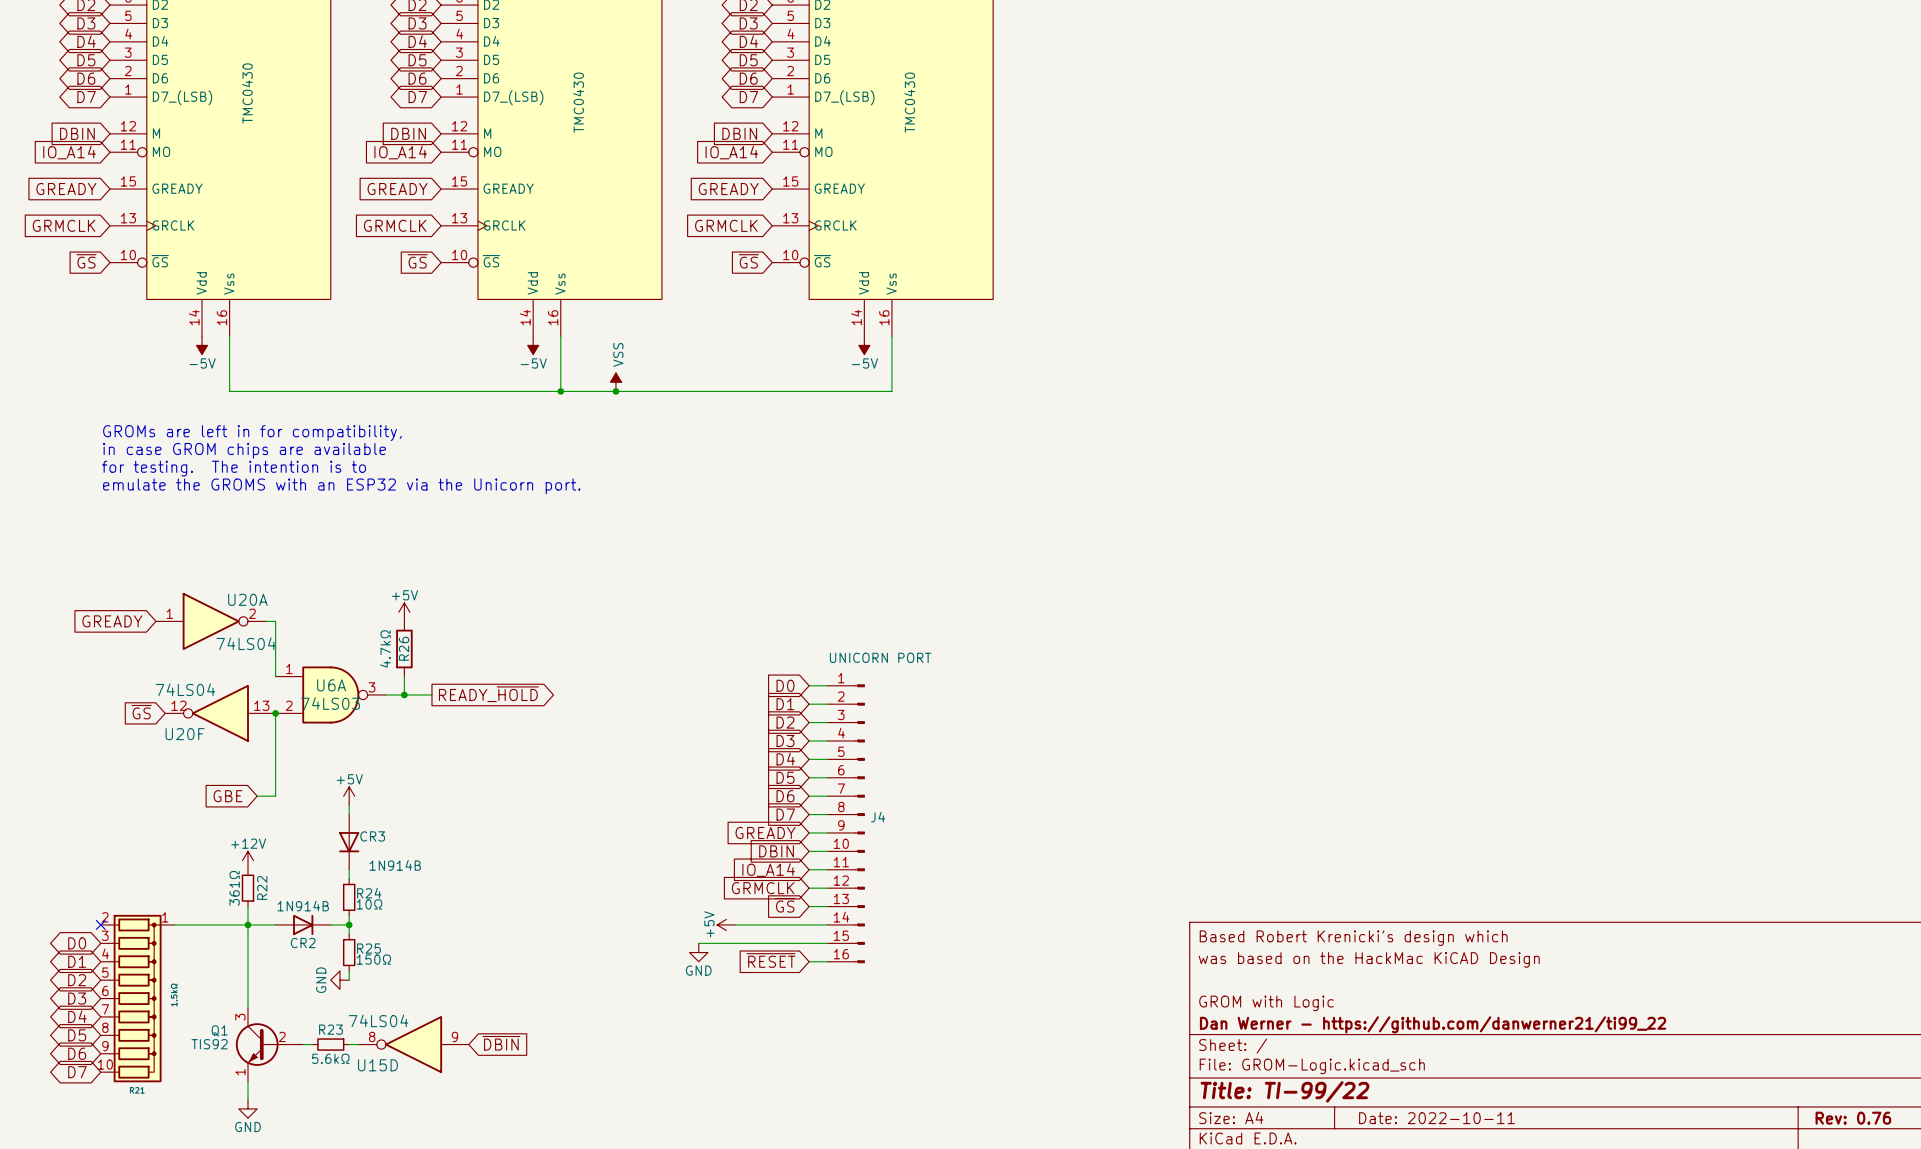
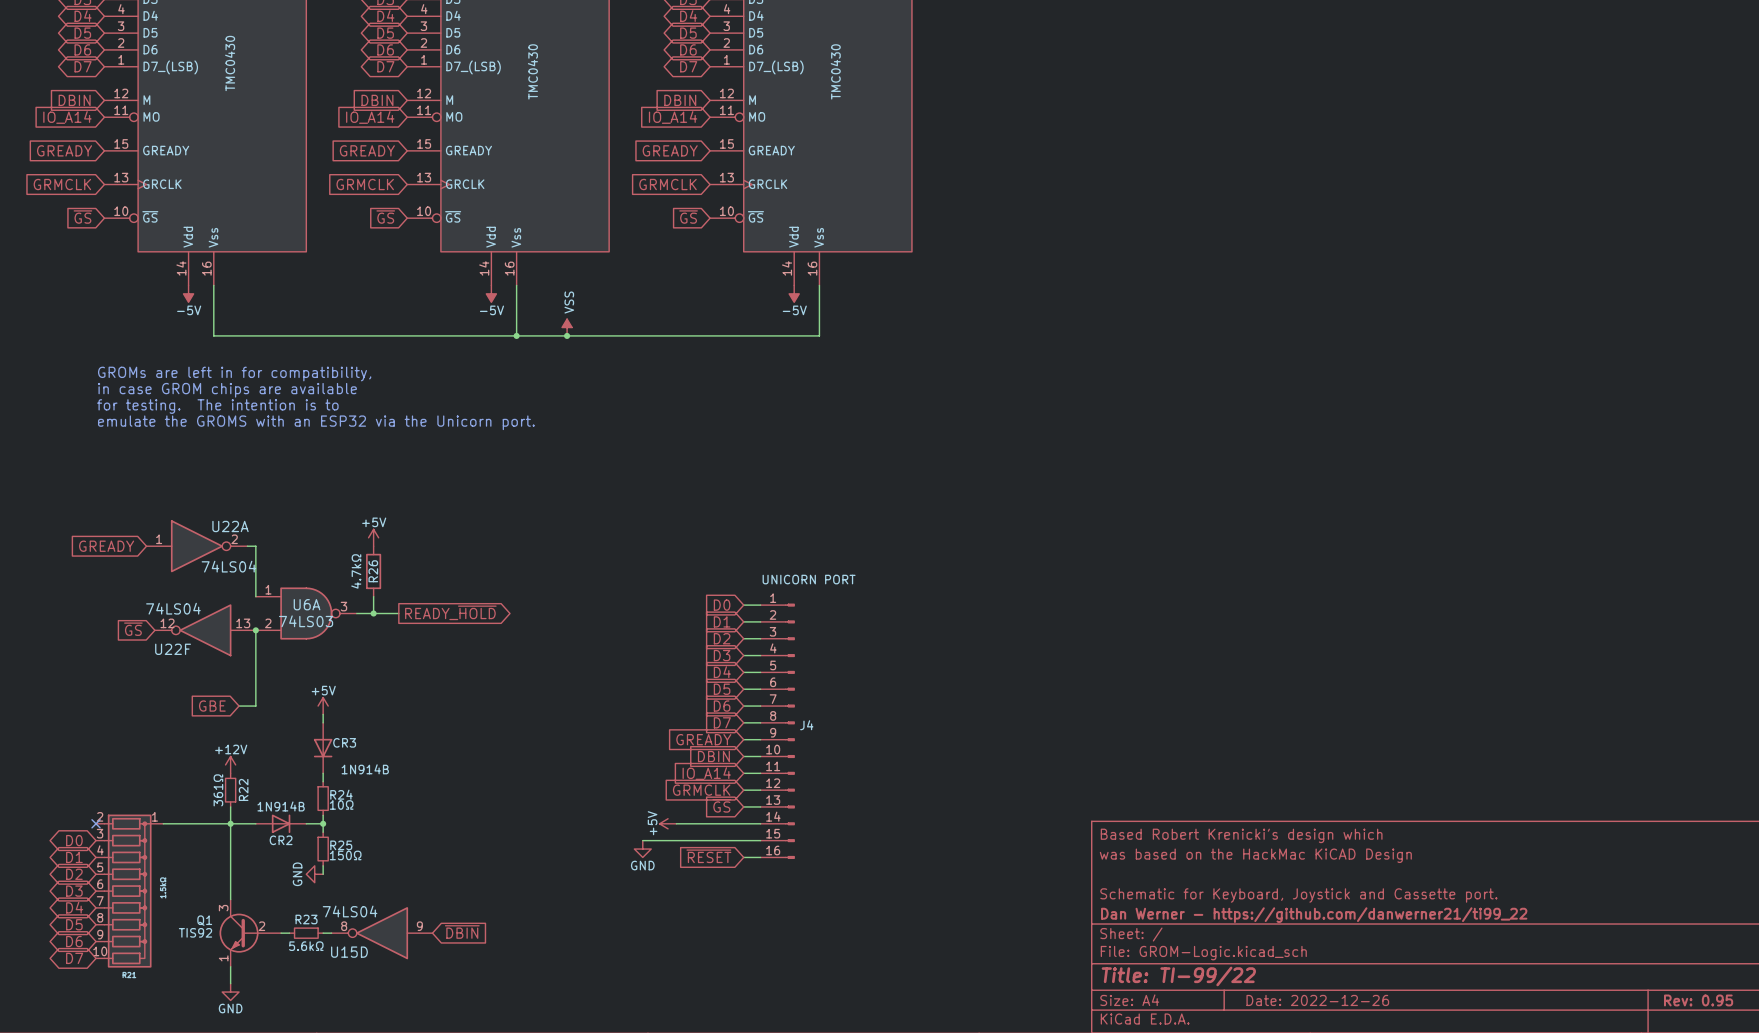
U20A name: U20A (247, 599) -> U22A (230, 526)
U20F name: U20F (185, 734) -> U22F (173, 649)
title block: GROM with Logic (1266, 1003) -> Schematic for Keyboard, Joystick and Cassette port. (1298, 895)
title block: Date: 2022-10-11 (1436, 1118) -> Date: 2022-12-26 (1317, 1000)
title block: Rev: 0.76 (1853, 1118) -> Rev: 0.95 (1698, 1000)

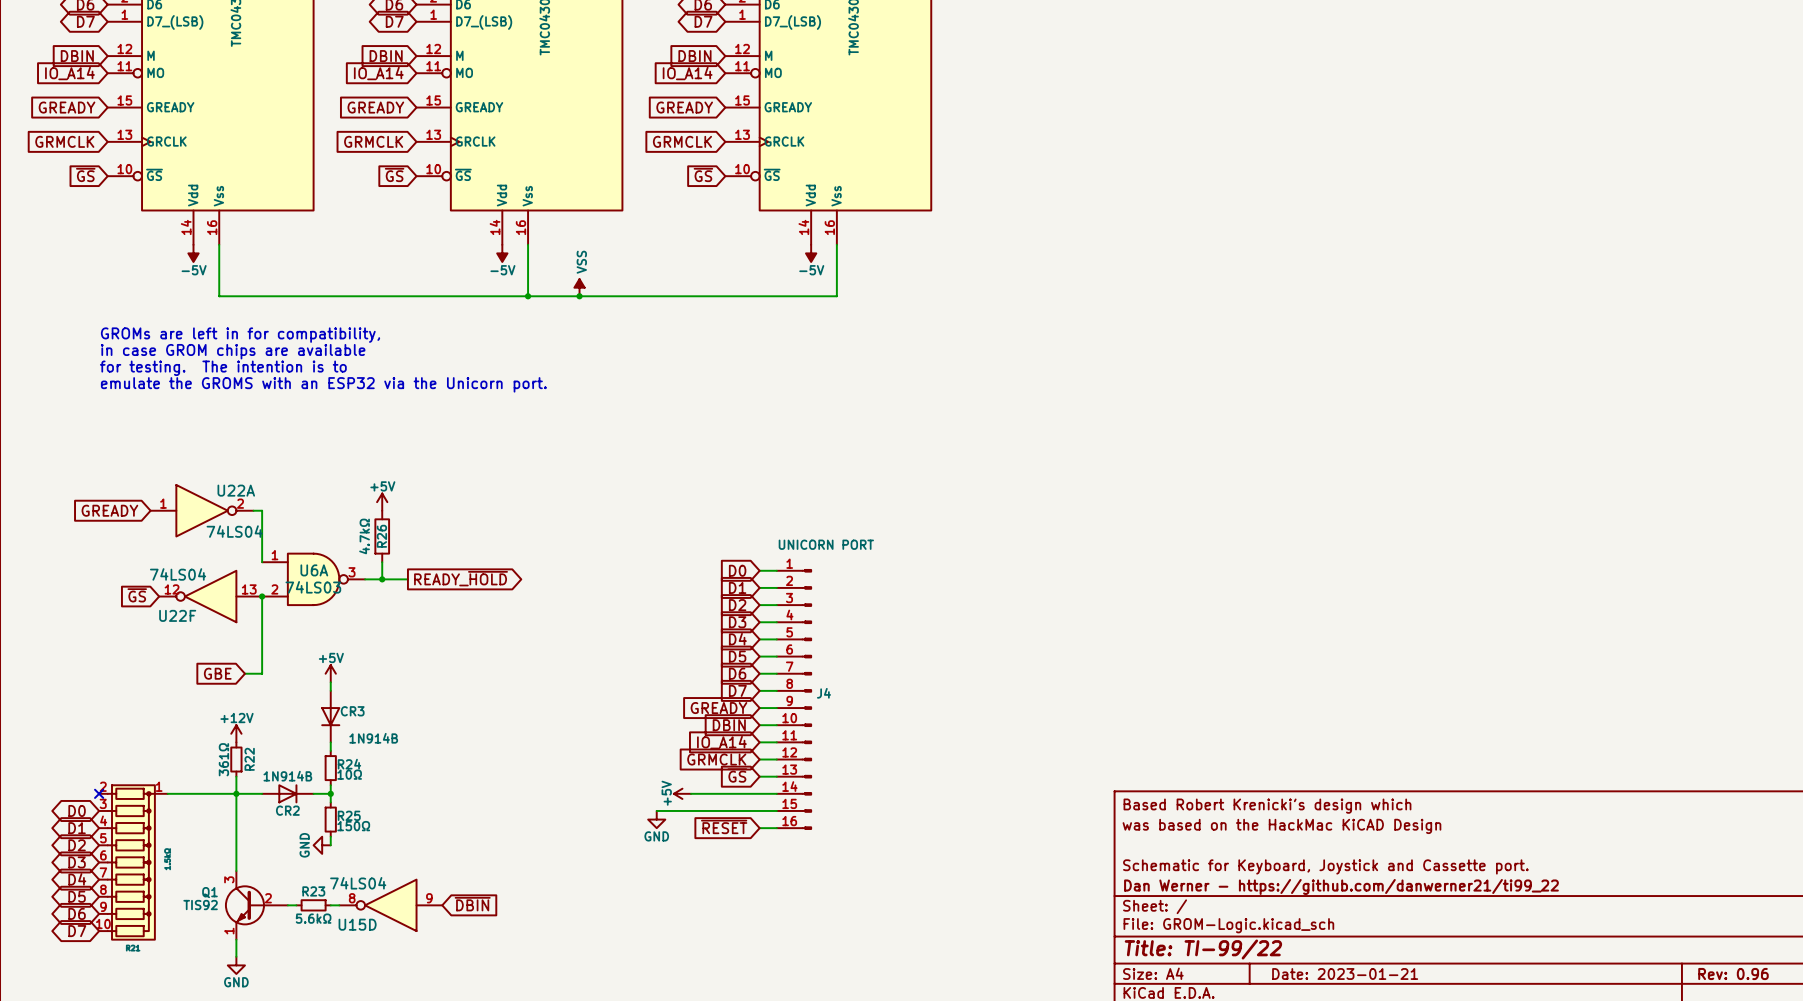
title block: Date: 2022-12-26 (1317, 1000) -> Date: 2023-01-21 (1345, 974)
title block: Rev: 0.95 (1698, 1000) -> Rev: 0.96 (1733, 974)

